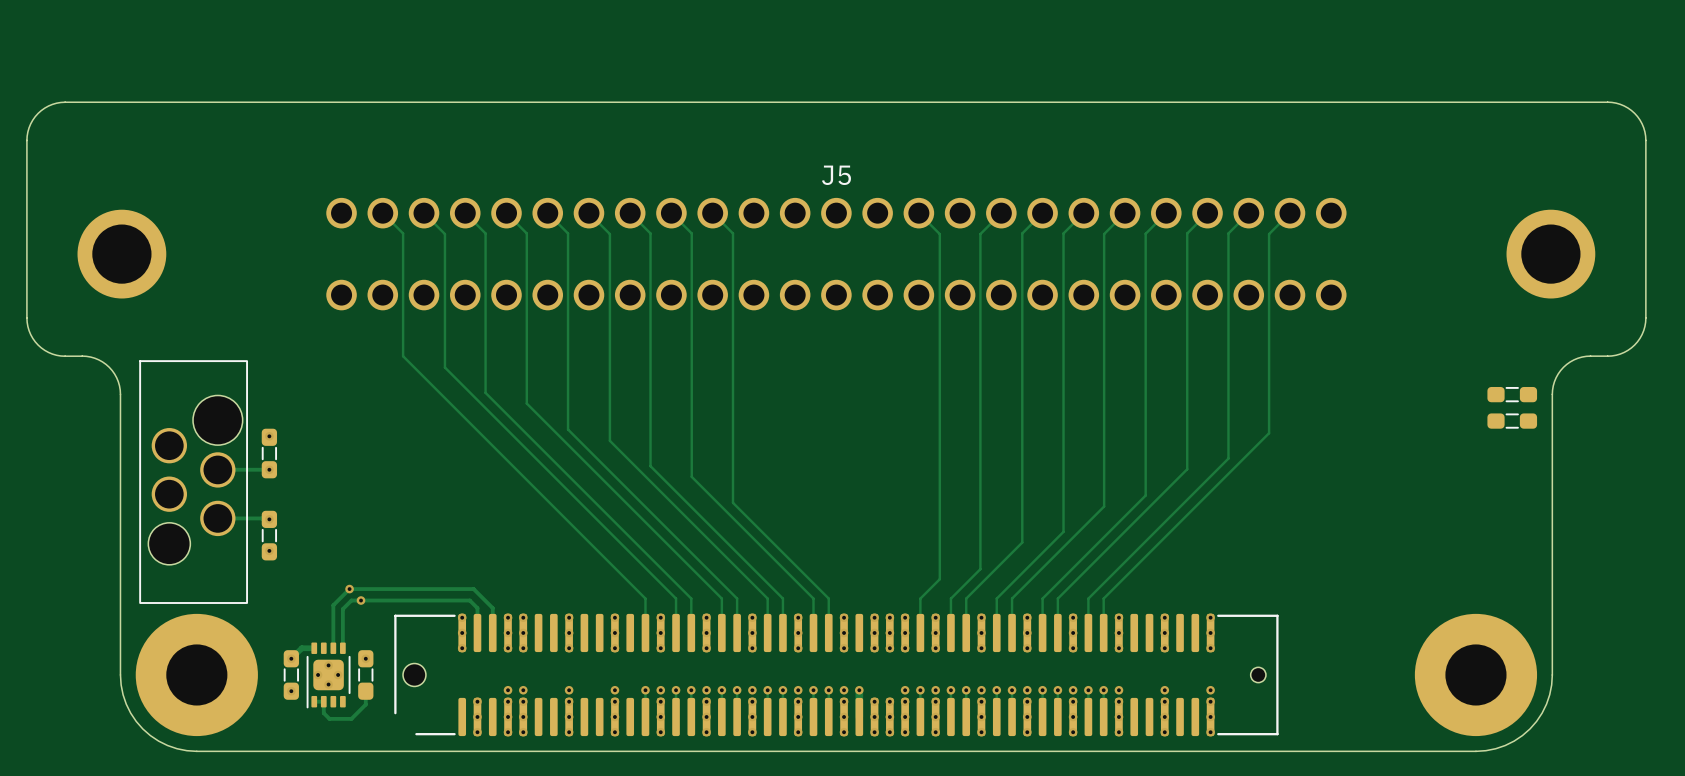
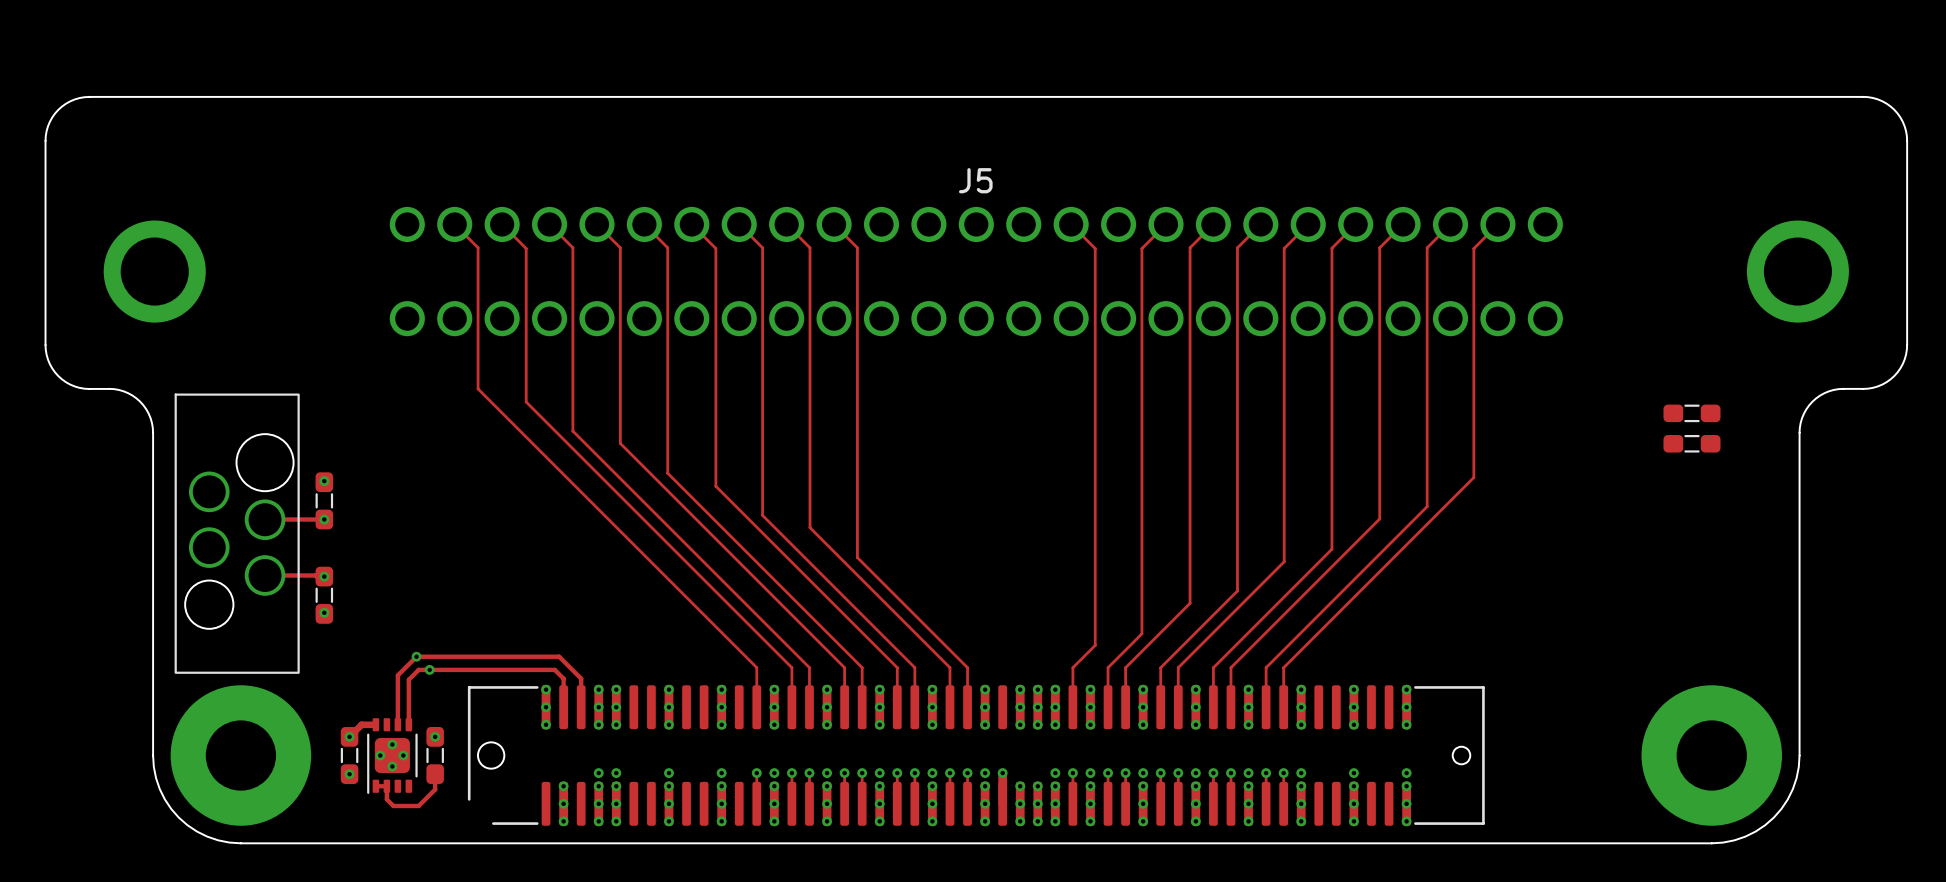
part: none -> (1691, 413)
part: (1512, 394) -> none
part: none -> (1691, 443)
part: (1512, 421) -> none

